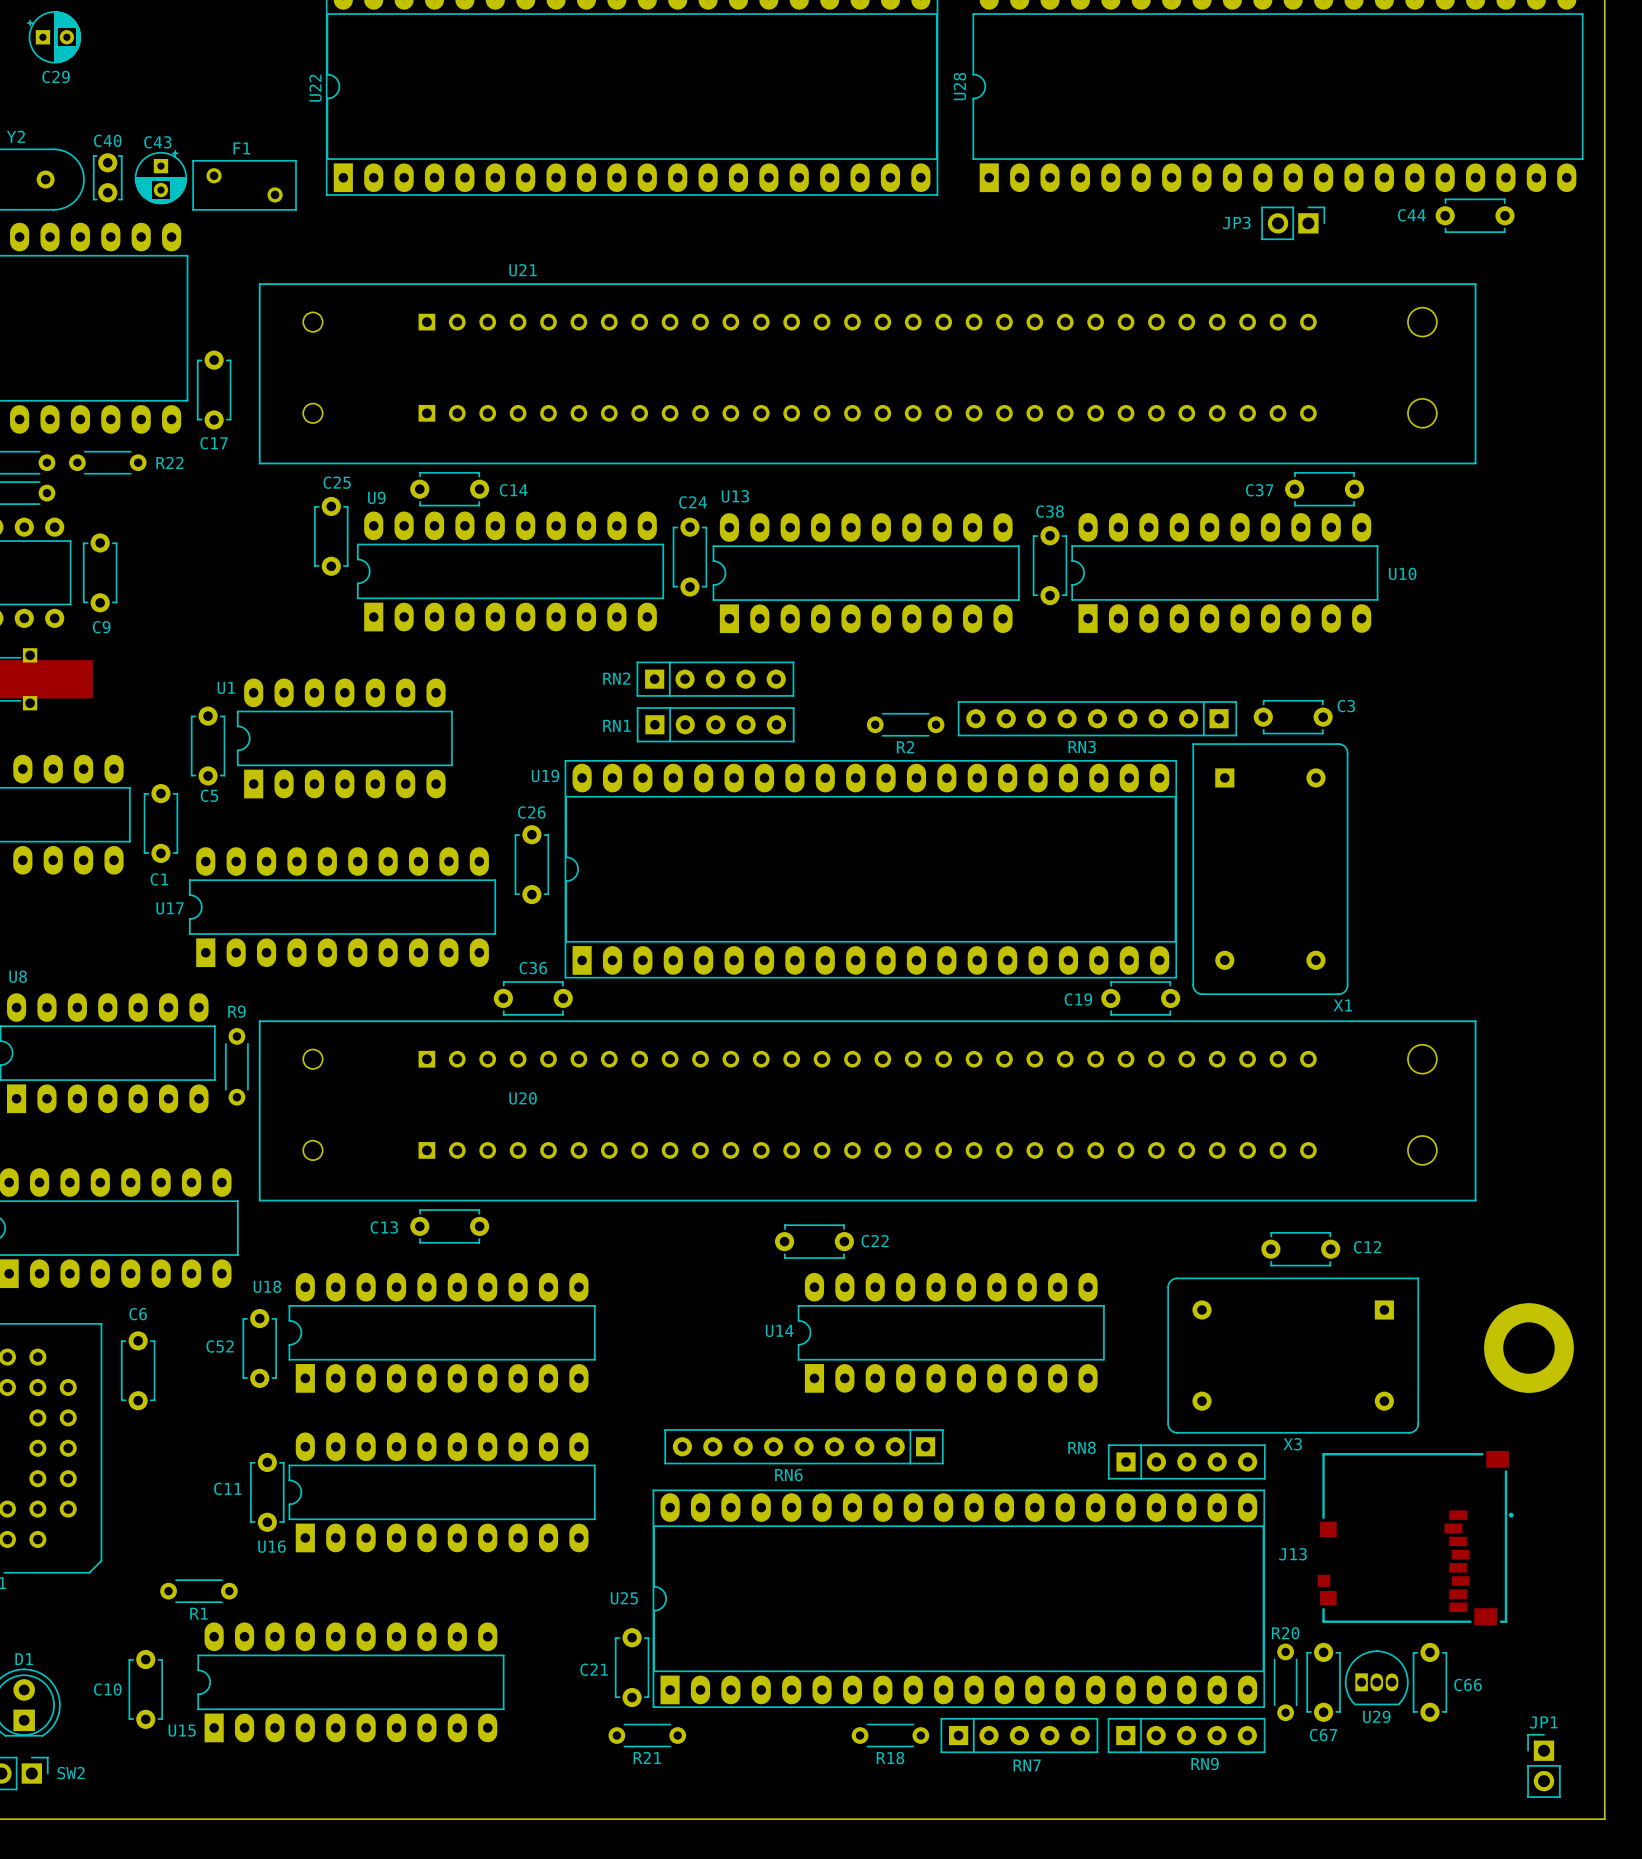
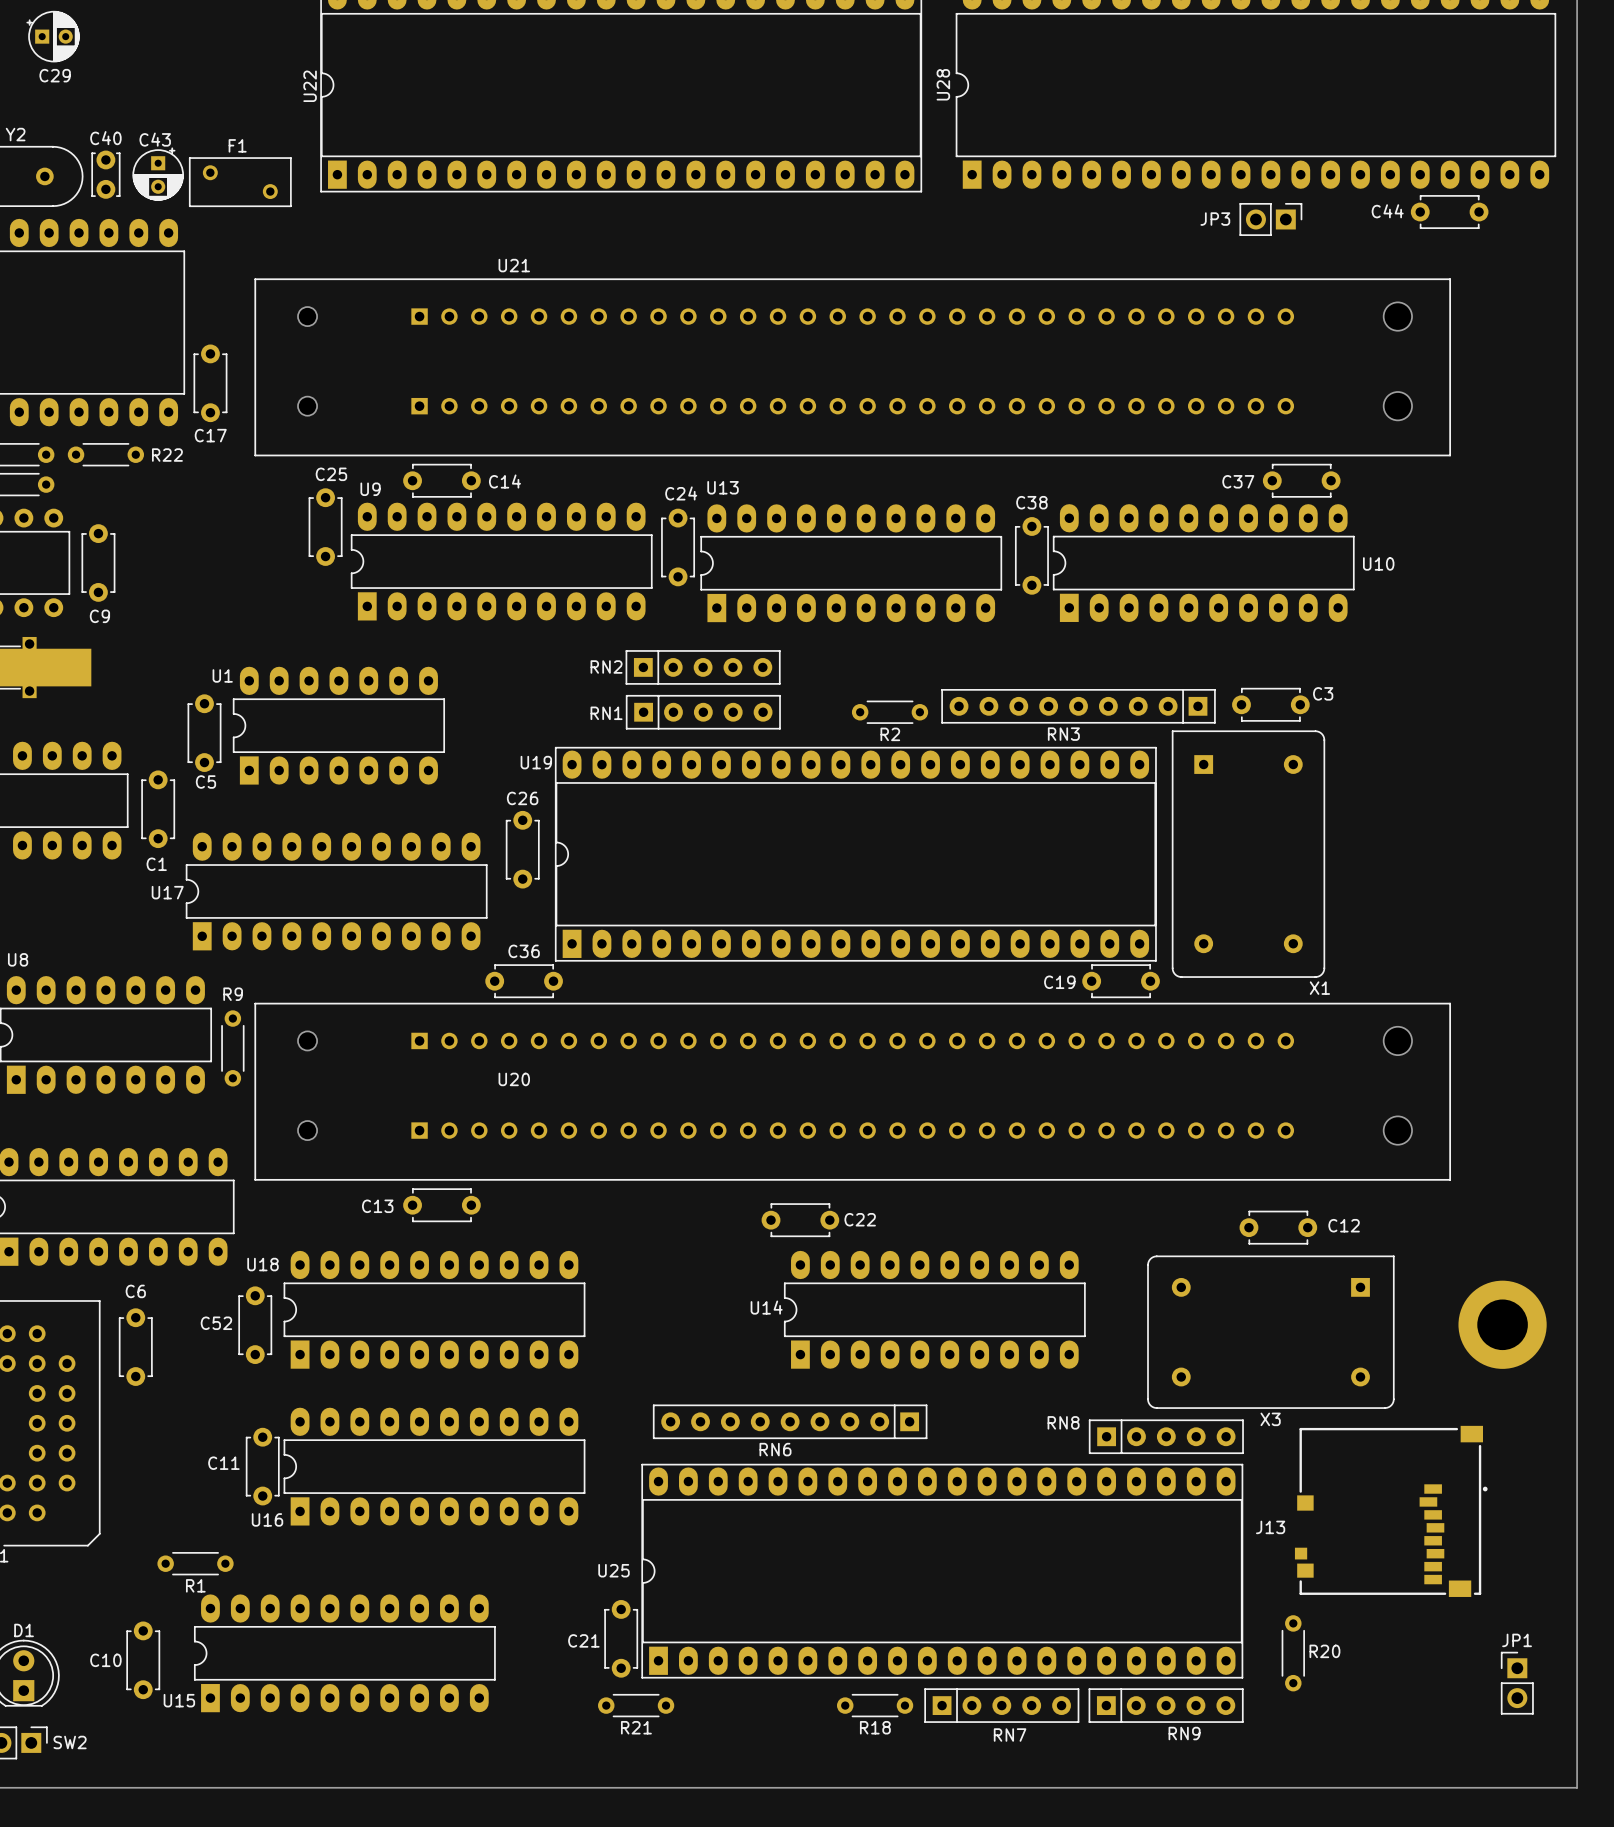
R20 name position: R20 (1285, 1633) -> R20 (1324, 1651)
U29: (1376, 1677) -> none
R20 position: (1285, 1682) -> (1293, 1653)
C67: (1323, 1682) -> none
C66: (1429, 1682) -> none
JP1 position: (1543, 1765) -> (1517, 1683)

